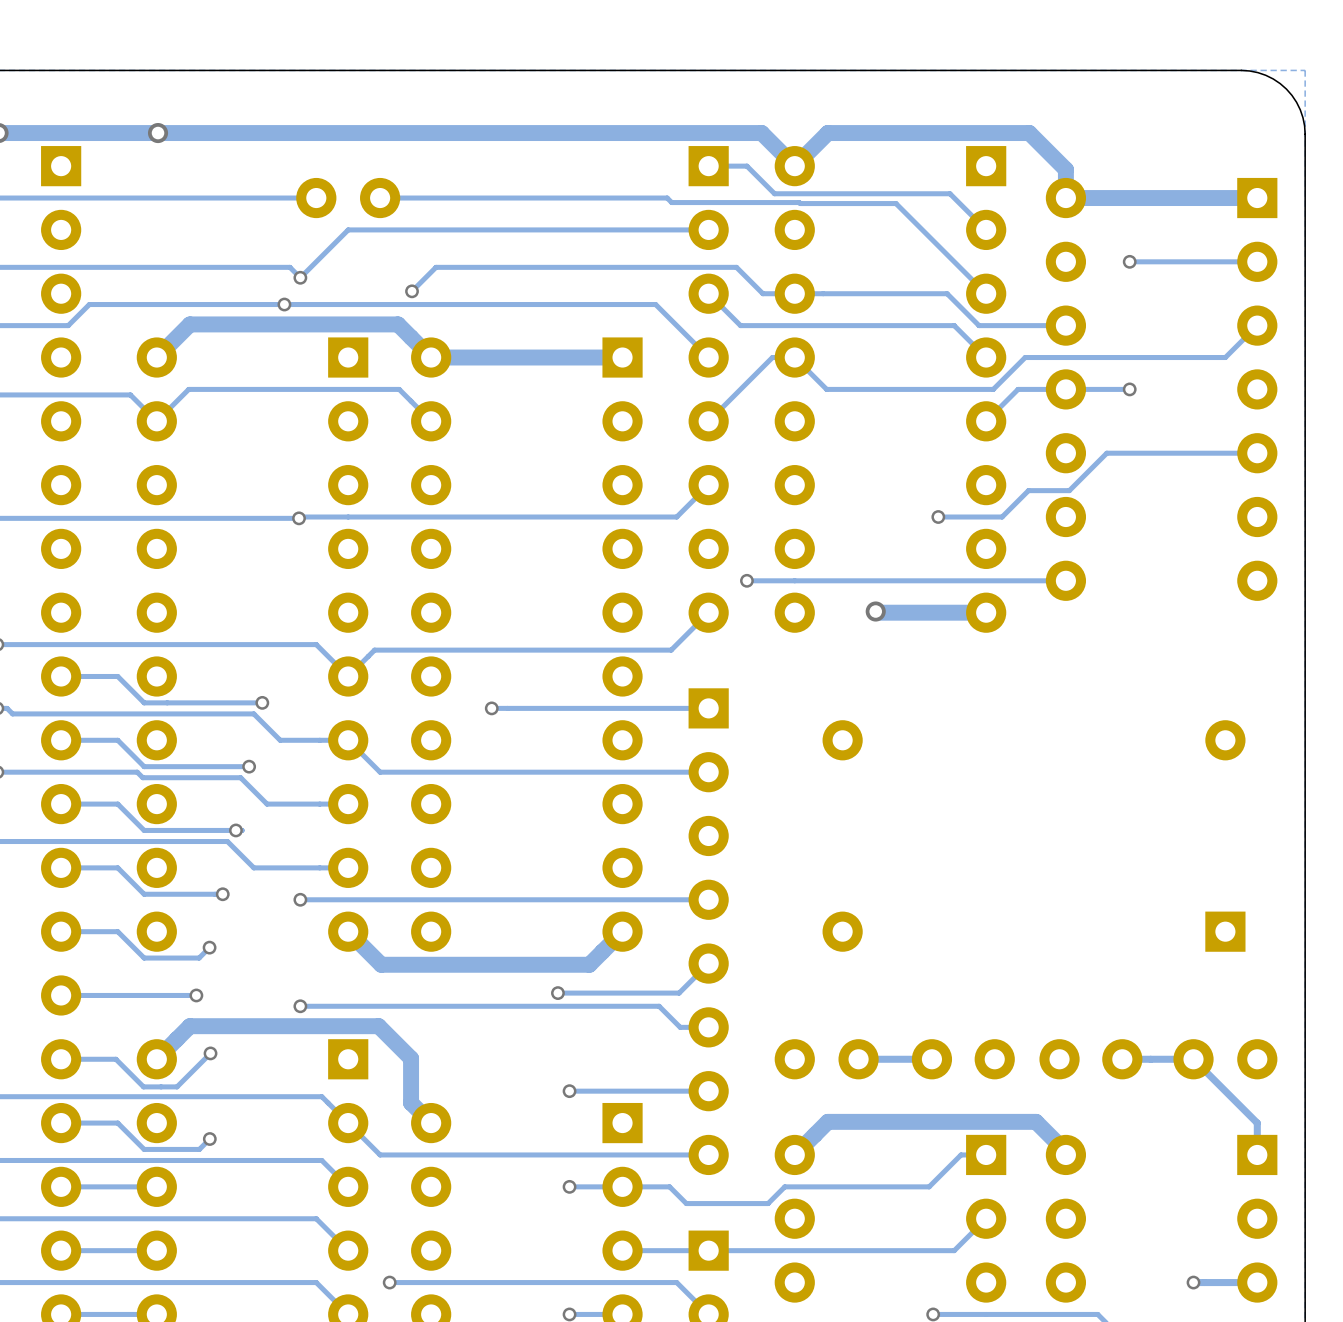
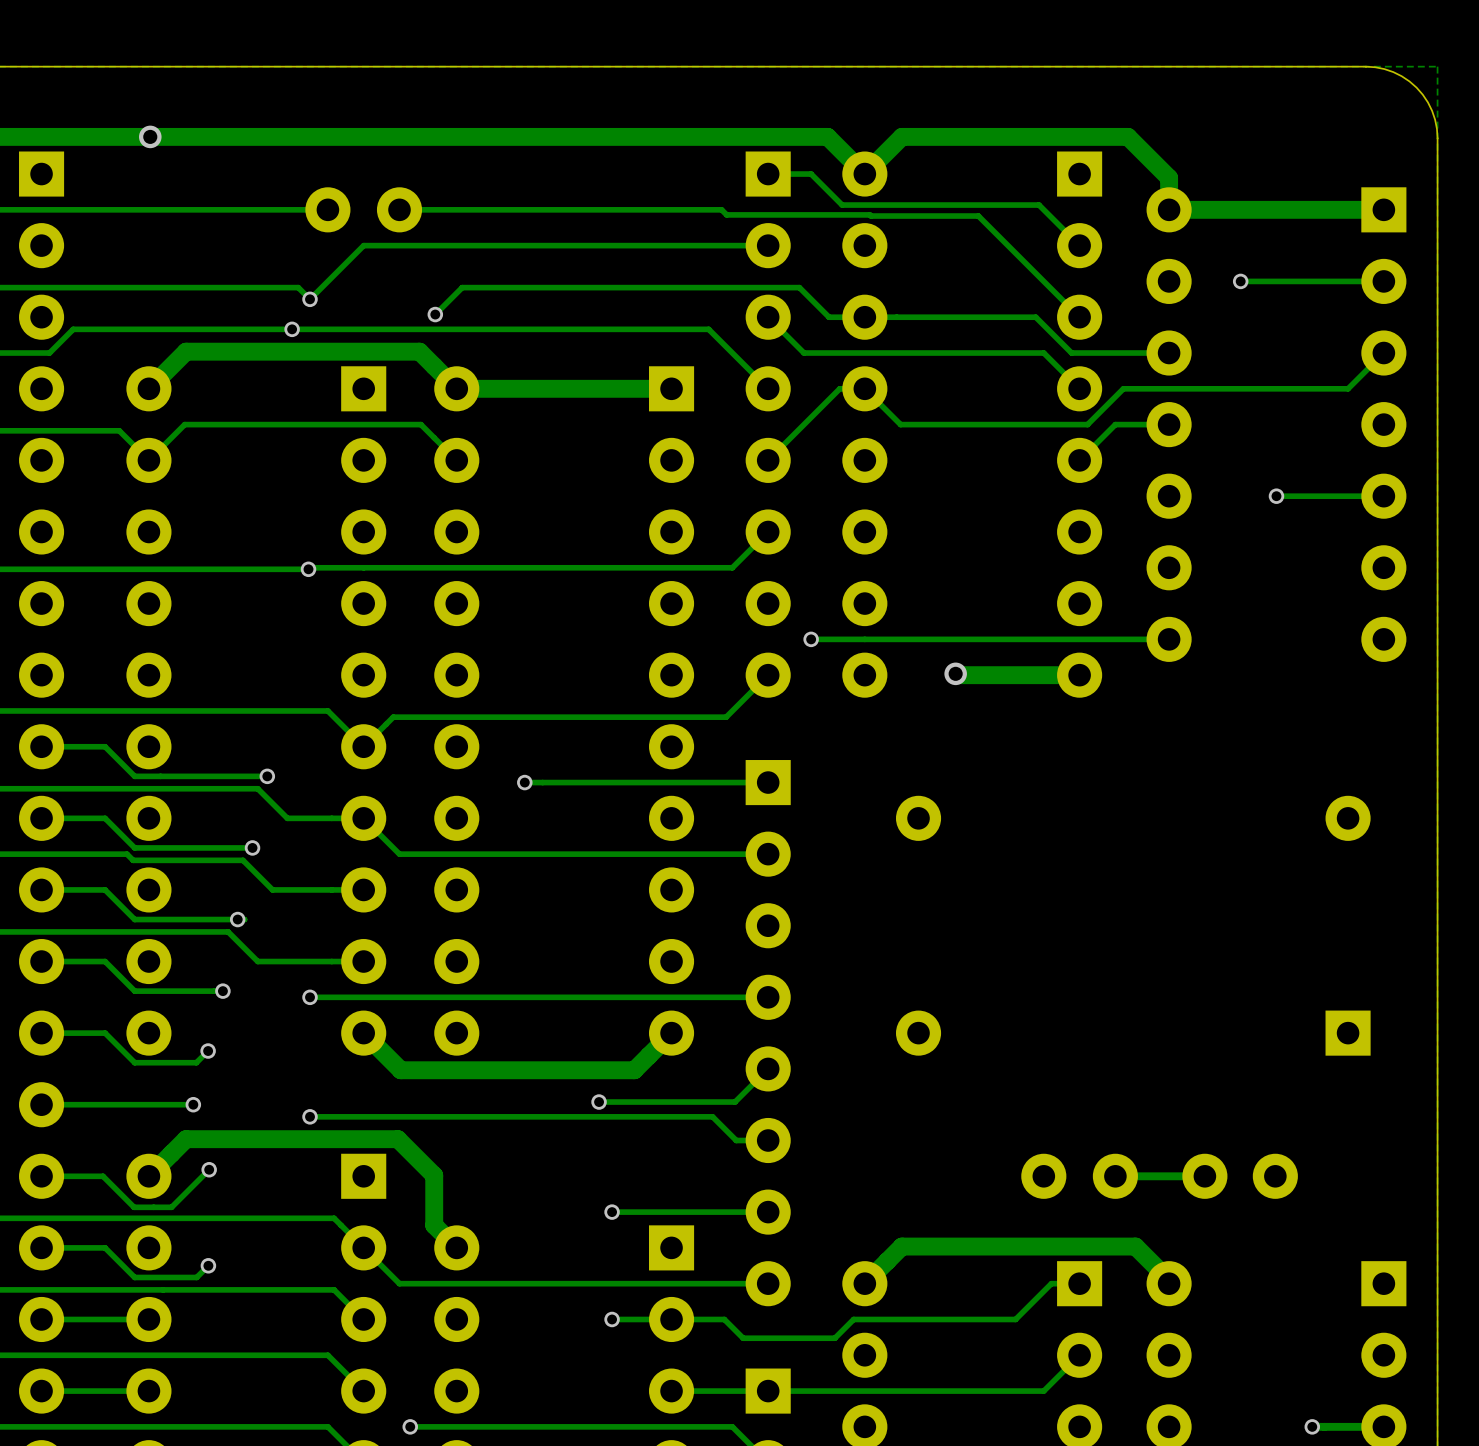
track: (1129, 389) (1065, 389) -> none
via position: (1129, 389) -> (1276, 496)
track: (1161, 453) (1106, 453) (1069, 490) (1028, 490) (1002, 517) (938, 517) -> none
via: (938, 517) -> none
part footprint: [911, 1039, 1015, 1080] -> [1021, 1153, 1138, 1199]
part: (826, 1059) -> none
track: (931, 1059) (858, 1059) -> none
part position: (1090, 1059) -> (1240, 1176)
track: none -> (1204, 1176) (1115, 1176)
track: (1122, 1059) (1193, 1059) (1257, 1123) (1257, 1154) -> none
part: (1225, 1059) -> none

